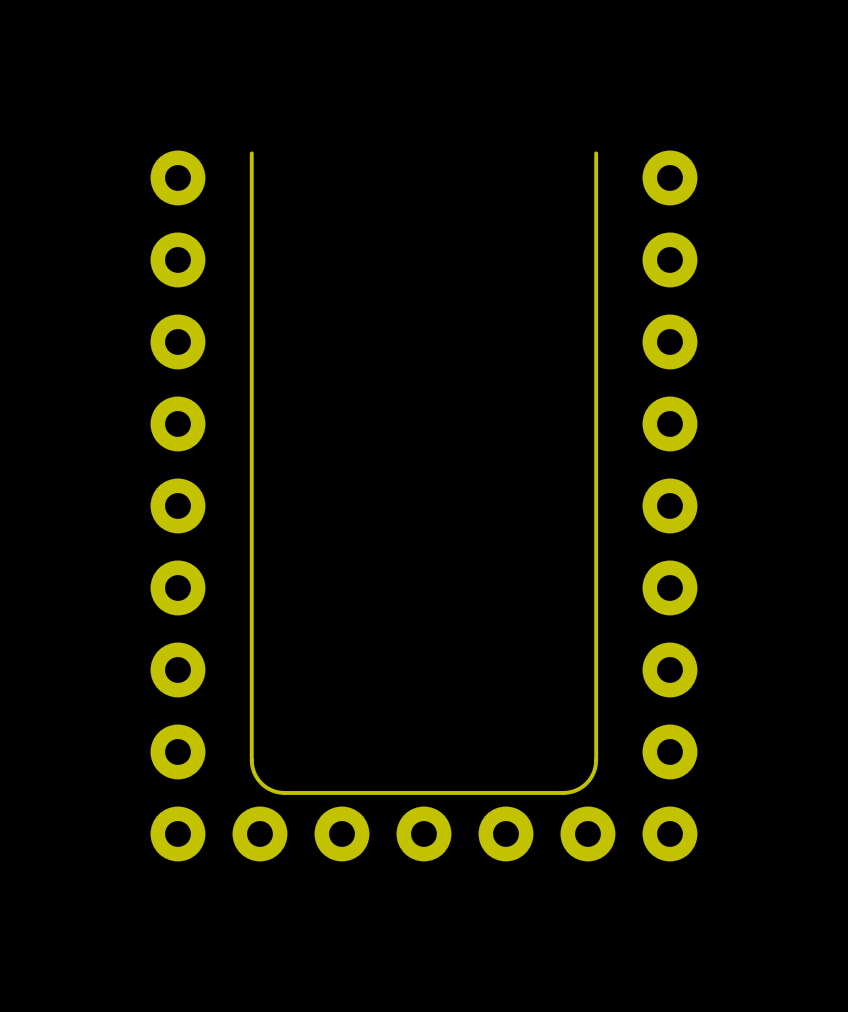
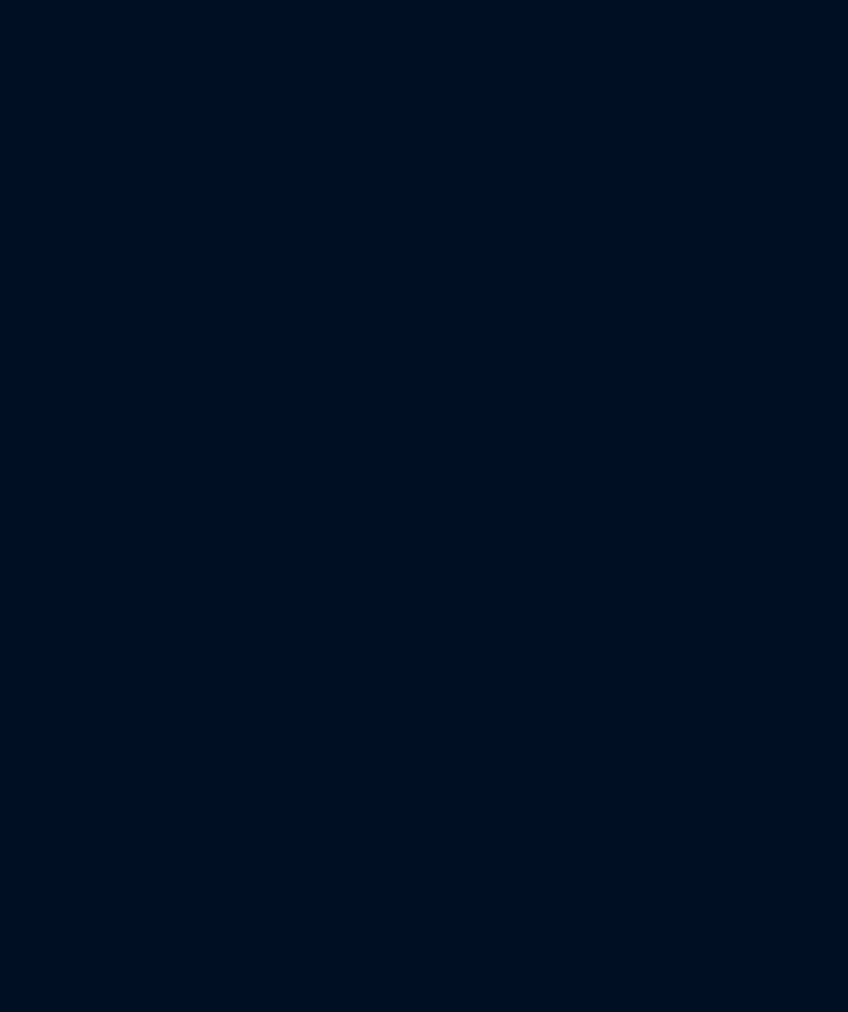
part: (423, 505) -> none

